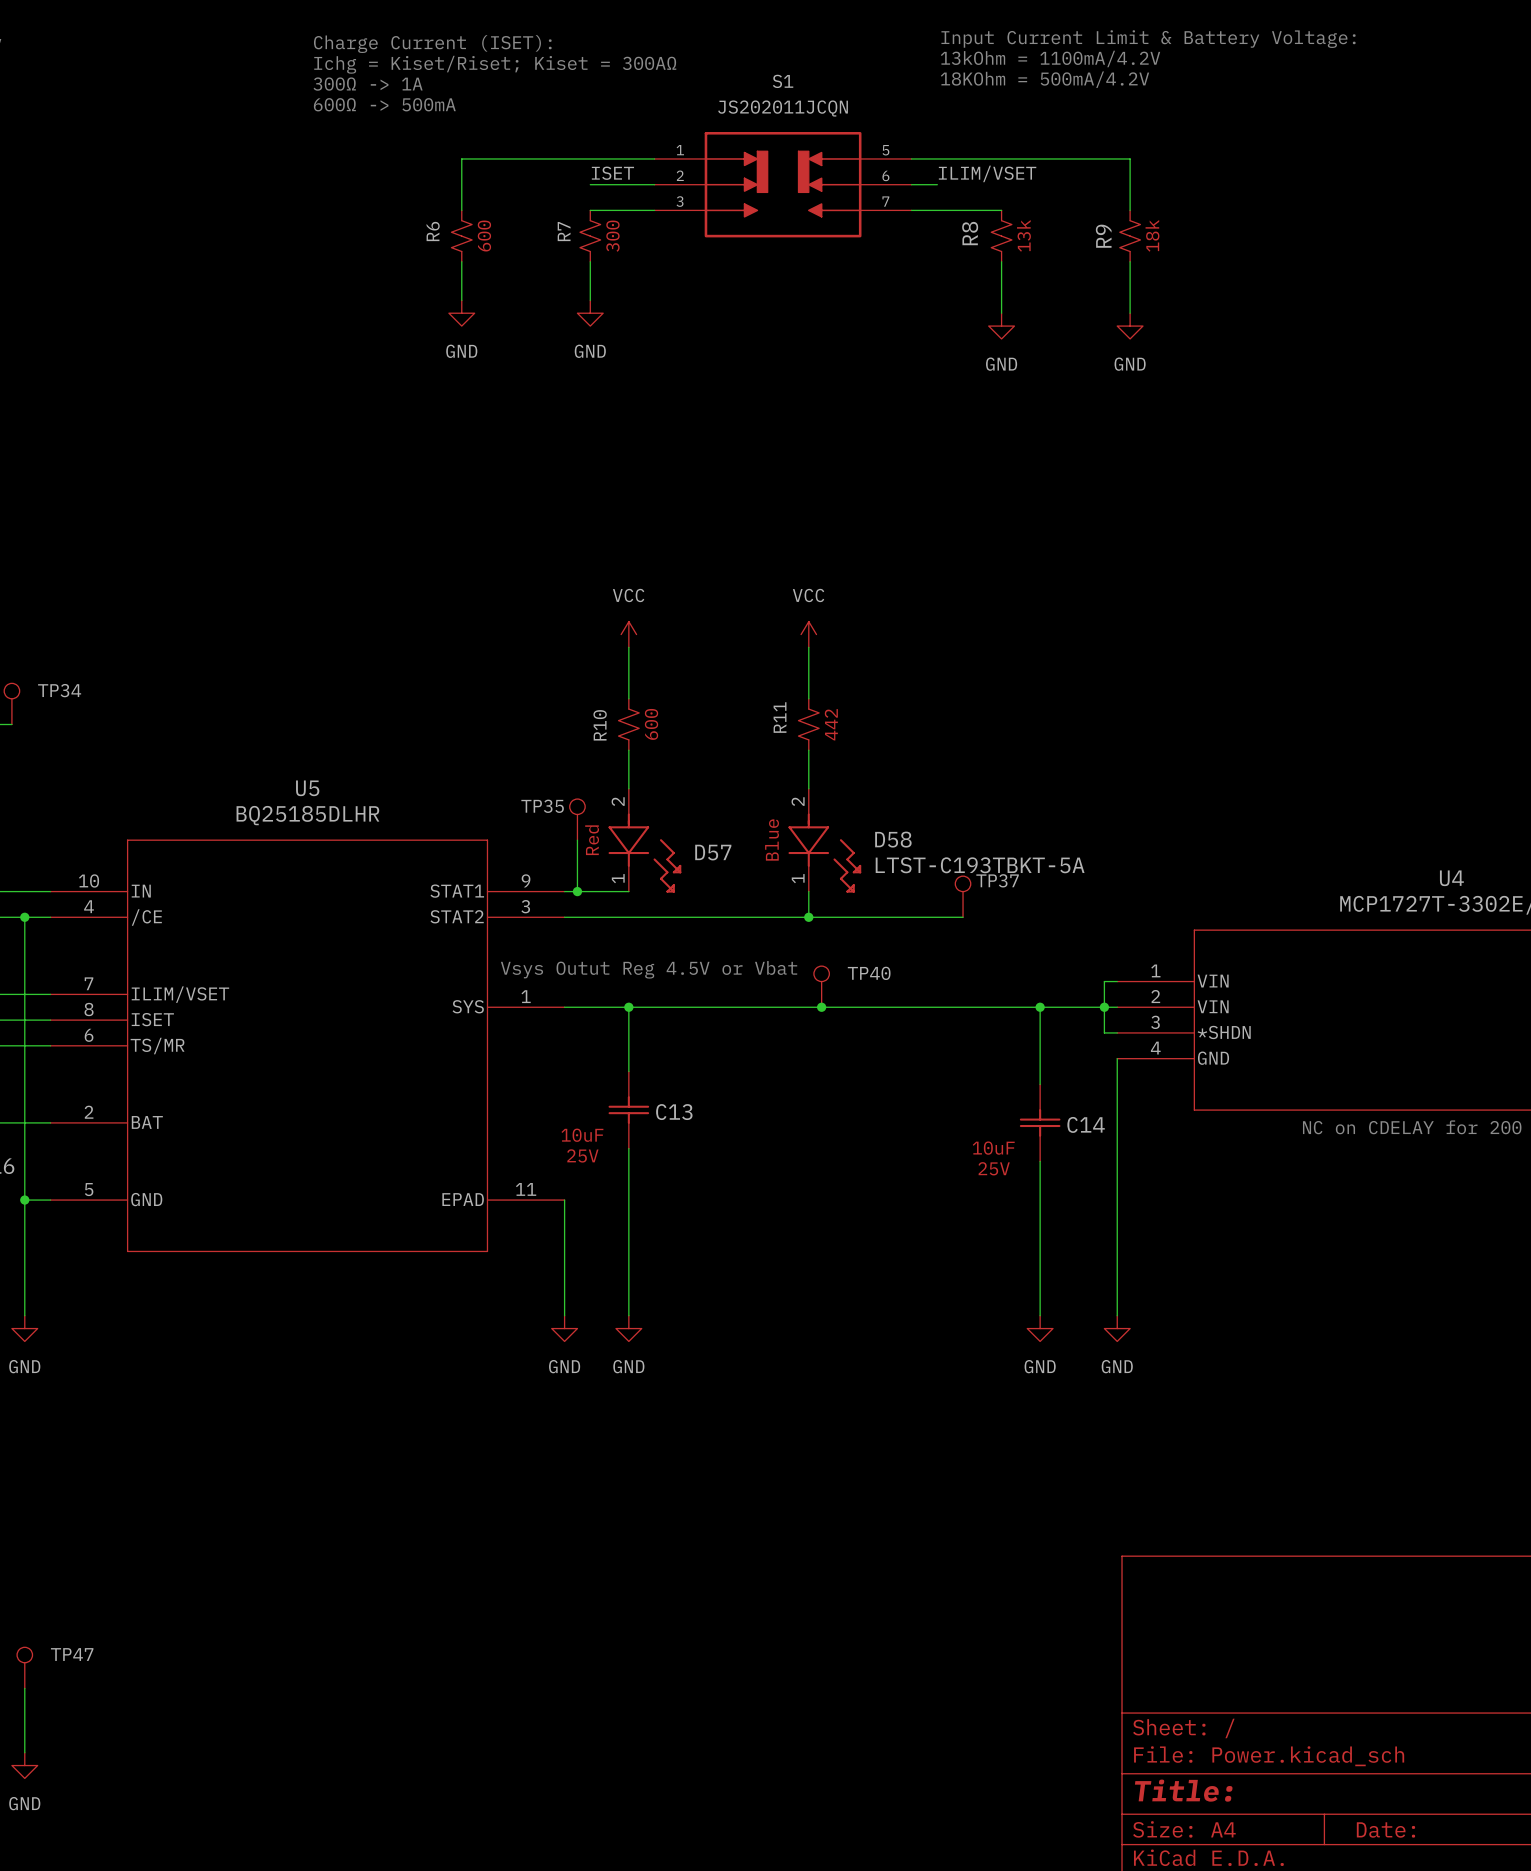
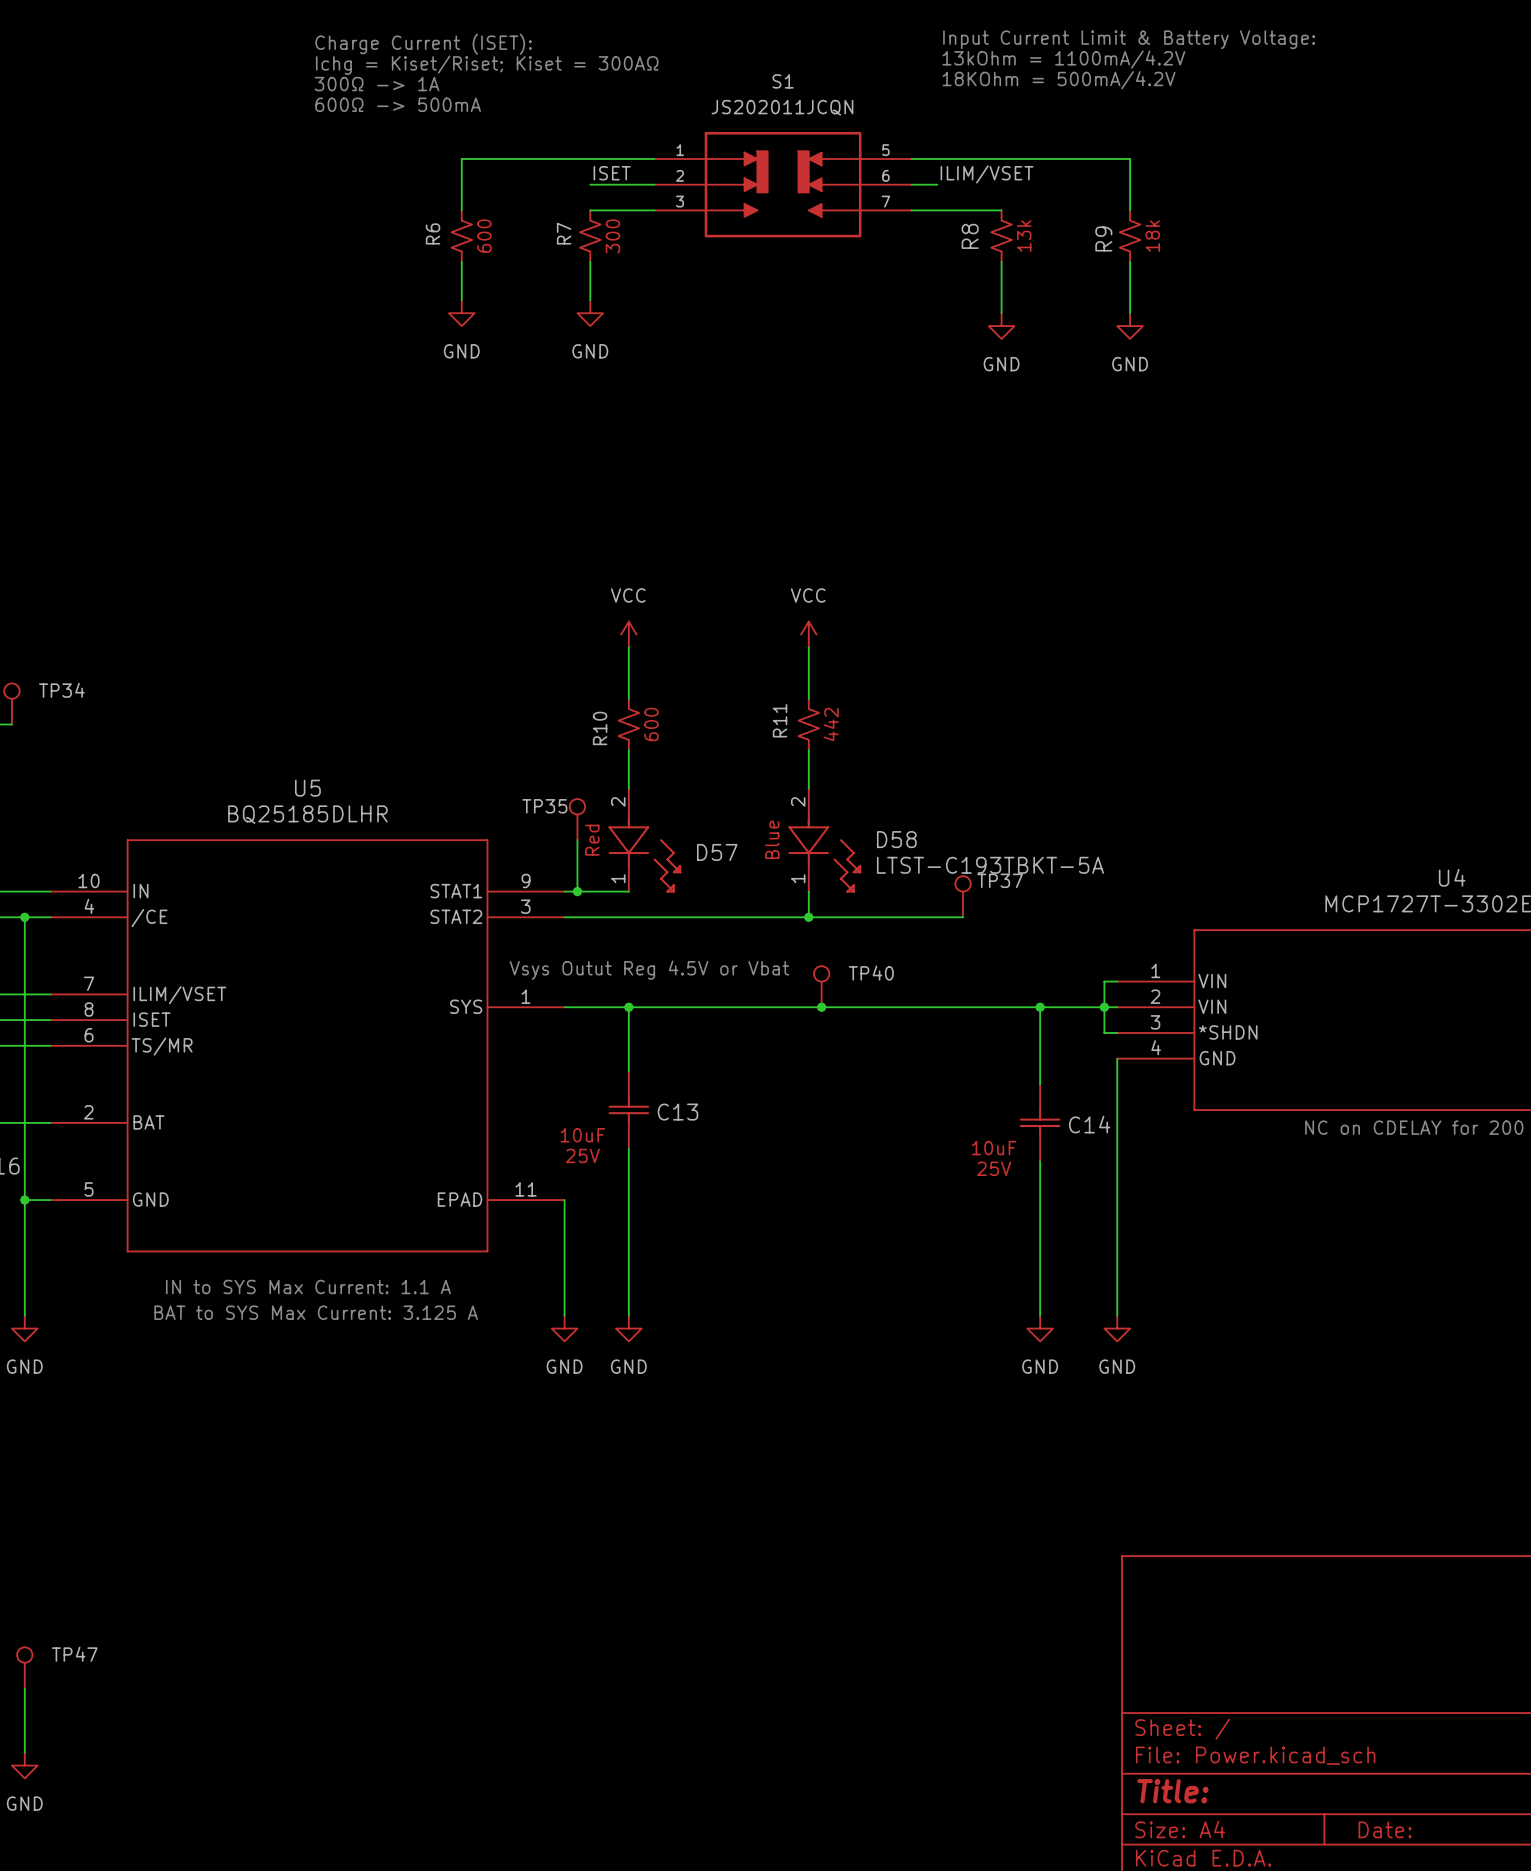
text: none -> IN to SYS Max Current: 1.1 A (308, 1287)
text: none -> BAT to SYS Max Current: 3.125 A (316, 1312)

